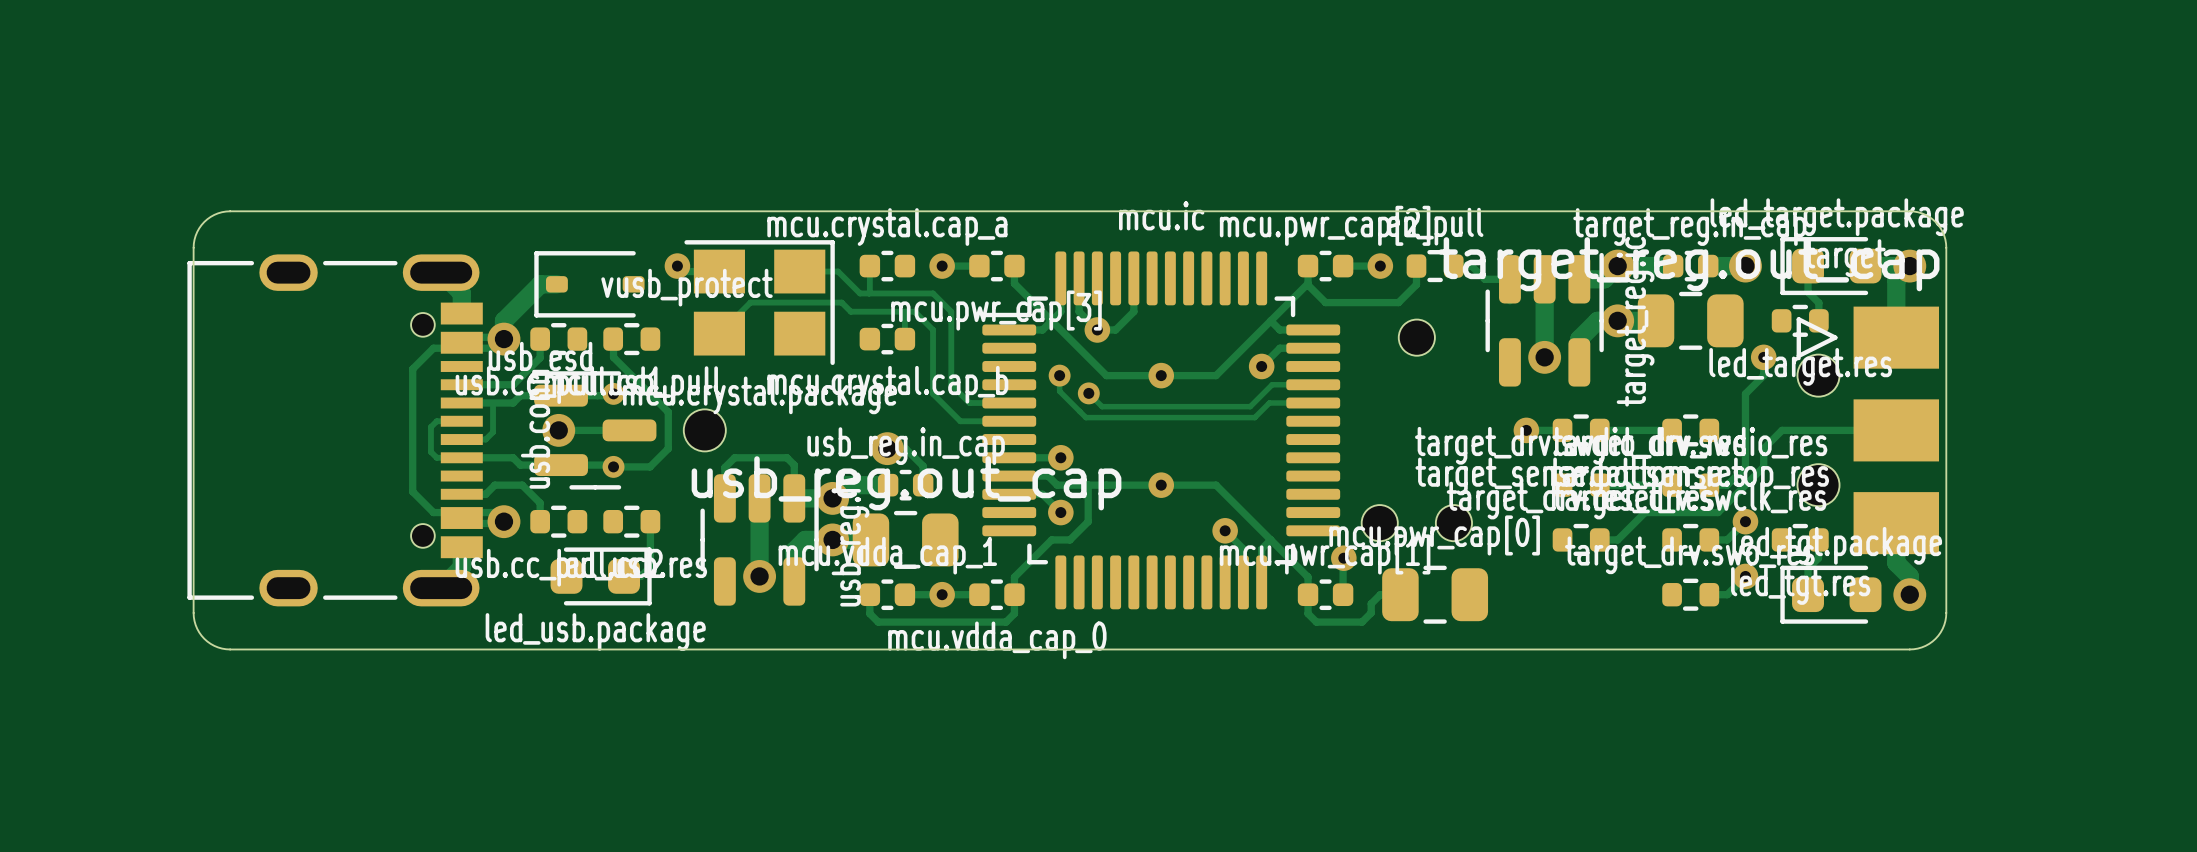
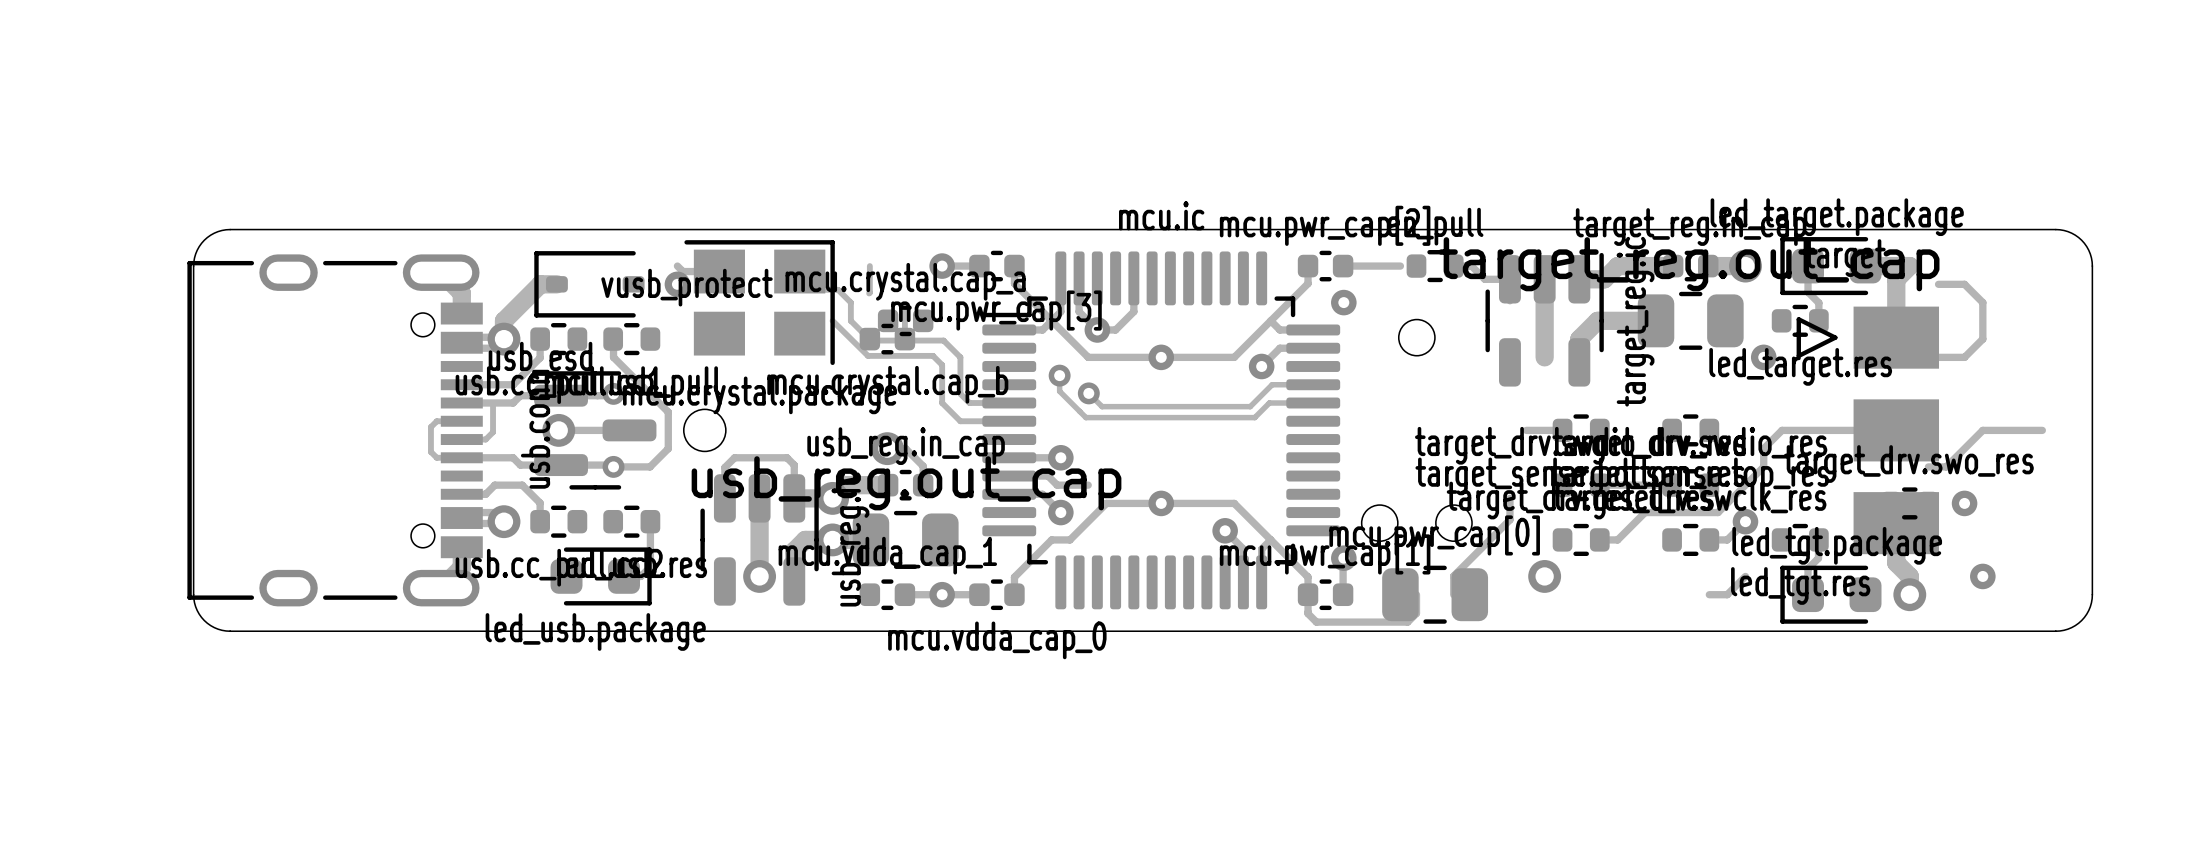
board edge: (193, 266) (193, 243) (199, 228) (214, 214) (230, 211) (1909, 211) (1921, 213) (1935, 222) (1944, 235) (1946, 247) (1946, 617) (1942, 628) (1935, 638) (1917, 648) (230, 649) (210, 643) (199, 632) (193, 617) (193, 594) -> (193, 266) (197, 250) (204, 240) (218, 231) (230, 229) (2055, 229) (2067, 231) (2081, 240) (2090, 254) (2092, 266) (2092, 598) (2084, 617) (2075, 625) (2063, 630) (230, 631) (214, 627) (204, 620) (197, 610) (193, 594)
via position: (677, 266) -> (677, 284)
mcu.crystal.cap_a position: (887, 266) -> (905, 320)
track: none -> (1380, 266) (1400, 266)
via position: (1380, 266) -> (1343, 302)
track: (1416, 266) (1416, 284) (1398, 302) (1325, 302) (1308, 283) -> none
via: (1617, 266) -> none
via: (1909, 266) -> none
track: (799, 271) (838, 271) (860, 293) (933, 293) (951, 311) (951, 384) (960, 393) -> (799, 289) (838, 289) (850, 302) (850, 320) (870, 340) (943, 340) (960, 357) (960, 393)
track: none -> (1938, 284) (1964, 284) (1982, 302) (1982, 339) (1964, 357) (1928, 357)
via: (1617, 320) -> none
track: (719, 333) (750, 302) (841, 302) (850, 311) (914, 311) (933, 329) (933, 393) (942, 403) -> (832, 320) (868, 355) (933, 355) (942, 365) (942, 403)
track: (461, 348) (433, 348) (412, 369) (412, 491) (433, 512) (461, 512) -> none
track: (1088, 357) (1106, 375) (1216, 375) (1234, 357) -> (1088, 357) (1234, 357)
via: (1544, 357) -> none
track: (1763, 357) (1763, 375) (1745, 393) (1745, 466) (1727, 485) (1709, 485) -> none
via position: (1161, 375) -> (1161, 357)
part: (1818, 375) -> none
via: (1526, 430) -> none
track: (1599, 430) (1672, 430) -> none
track: none -> (2042, 430) (1982, 430) (1946, 466) (1928, 466)
via position: (1161, 485) -> (1161, 503)
part: (1818, 485) -> none
track: none -> (1509, 498) (1509, 519) (1453, 576) (1453, 594)
track: (1234, 503) (1216, 485) (1088, 485) (1088, 521) -> (1234, 503) (1106, 503) (1088, 521)
via: none -> (1964, 503)
via: none -> (1544, 576)
via: (1745, 576) -> none
via: none -> (1982, 576)
track: (869, 594) (869, 613) (878, 622) (1006, 622) (1014, 613) (1014, 594) -> none
track: (1400, 594) (1380, 594) (1371, 603) (1371, 612) (1362, 622) -> (1416, 594) (1416, 613) (1407, 622) (1362, 622)
target_drv.swo_res position: (1690, 594) -> (1909, 503)

